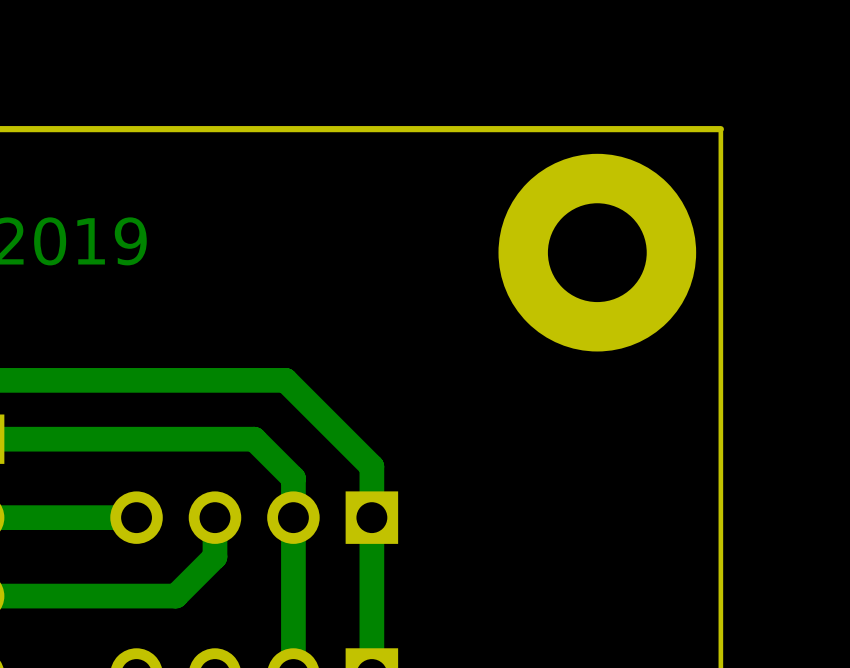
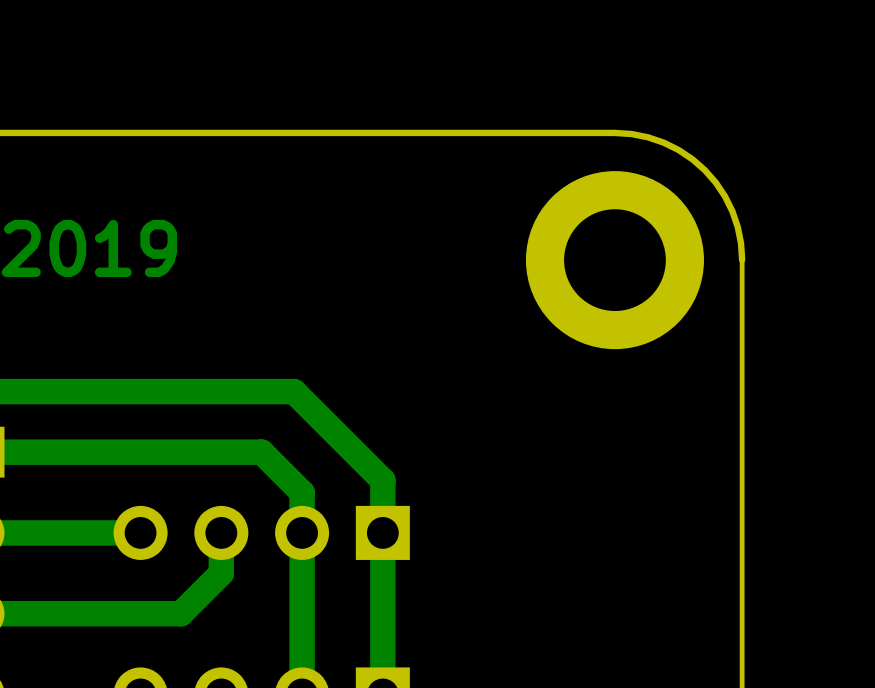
board edge: (597, 129) (720, 129) (720, 252) -> (614, 132) (631, 134) (663, 142) (678, 149) (704, 170) (715, 182) (732, 211) (737, 227) (742, 260)
part footprint: [498, 153, 697, 352] -> [525, 171, 704, 350]

